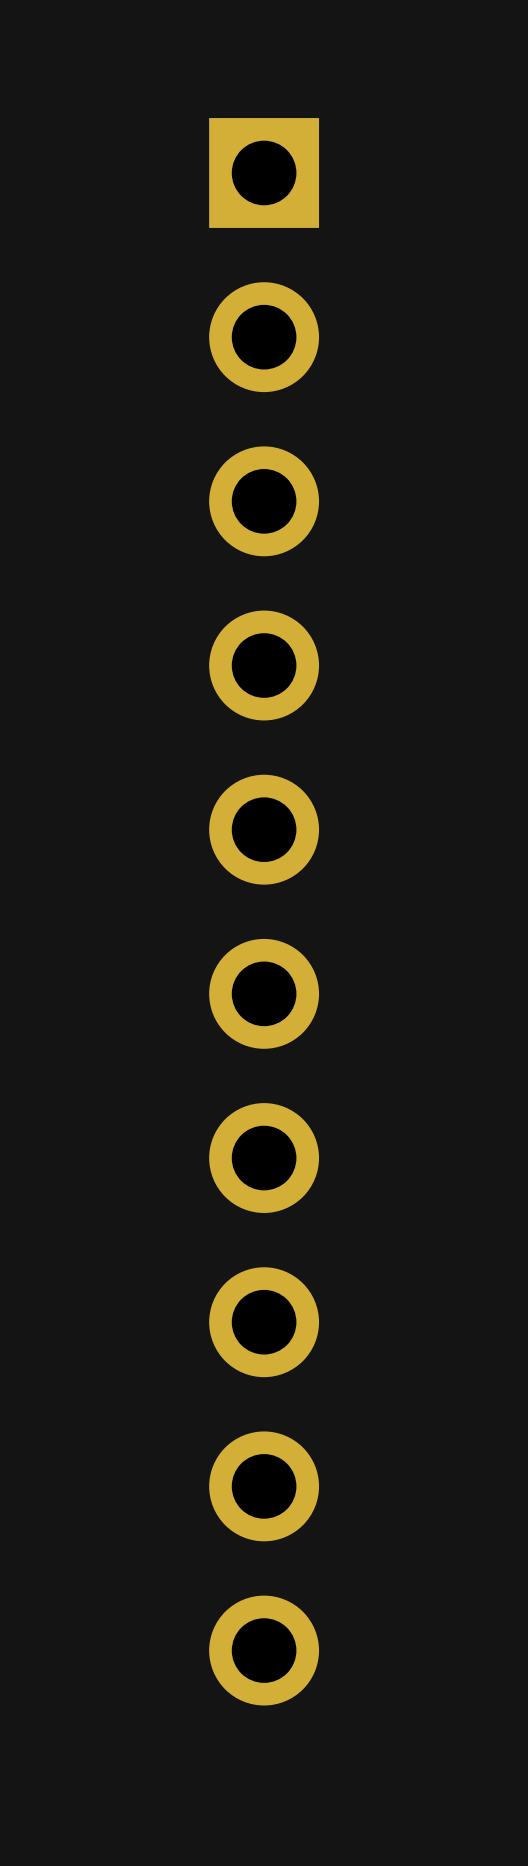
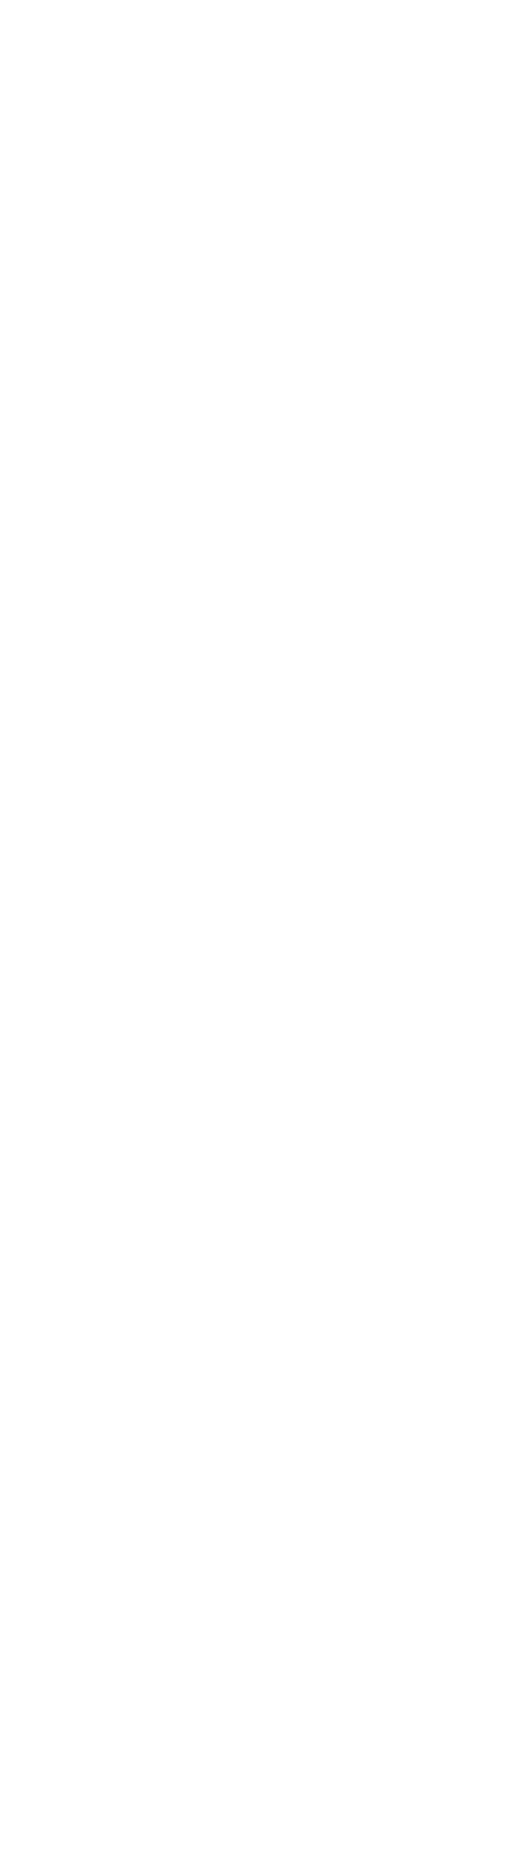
part: (264, 911) -> none

